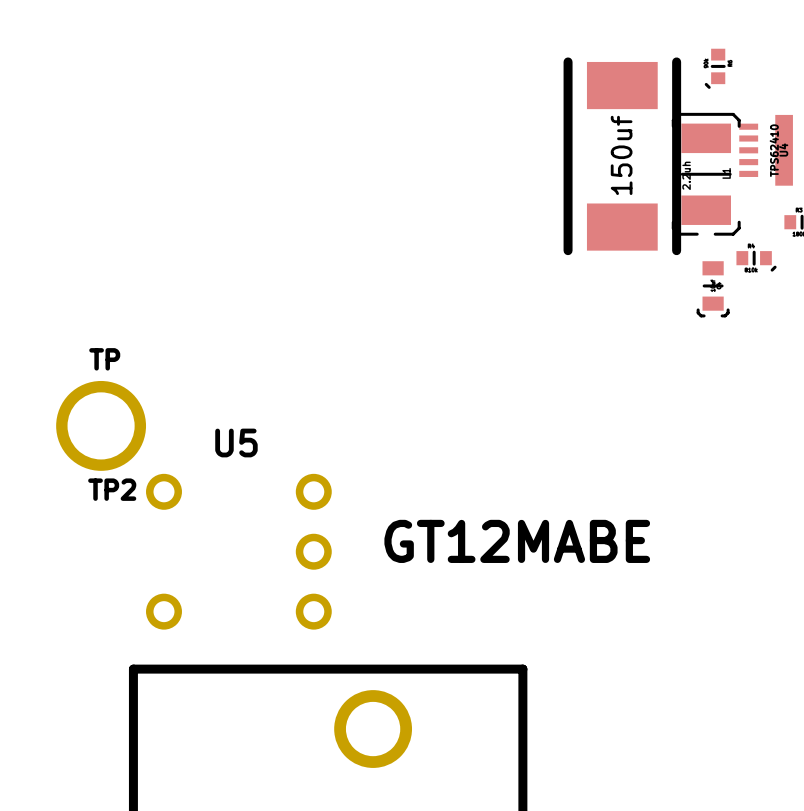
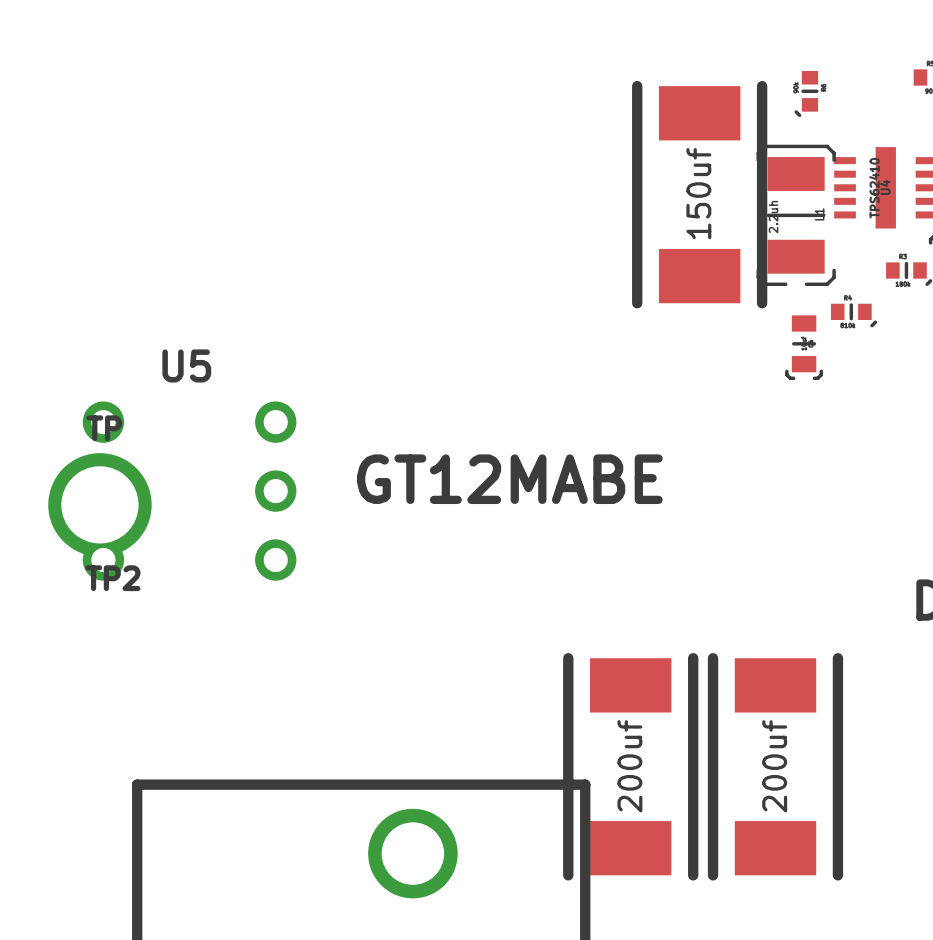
U5 position: (238, 551) -> (189, 491)
part: none -> 200uf (630, 766)
part: none -> 200uf (775, 766)

